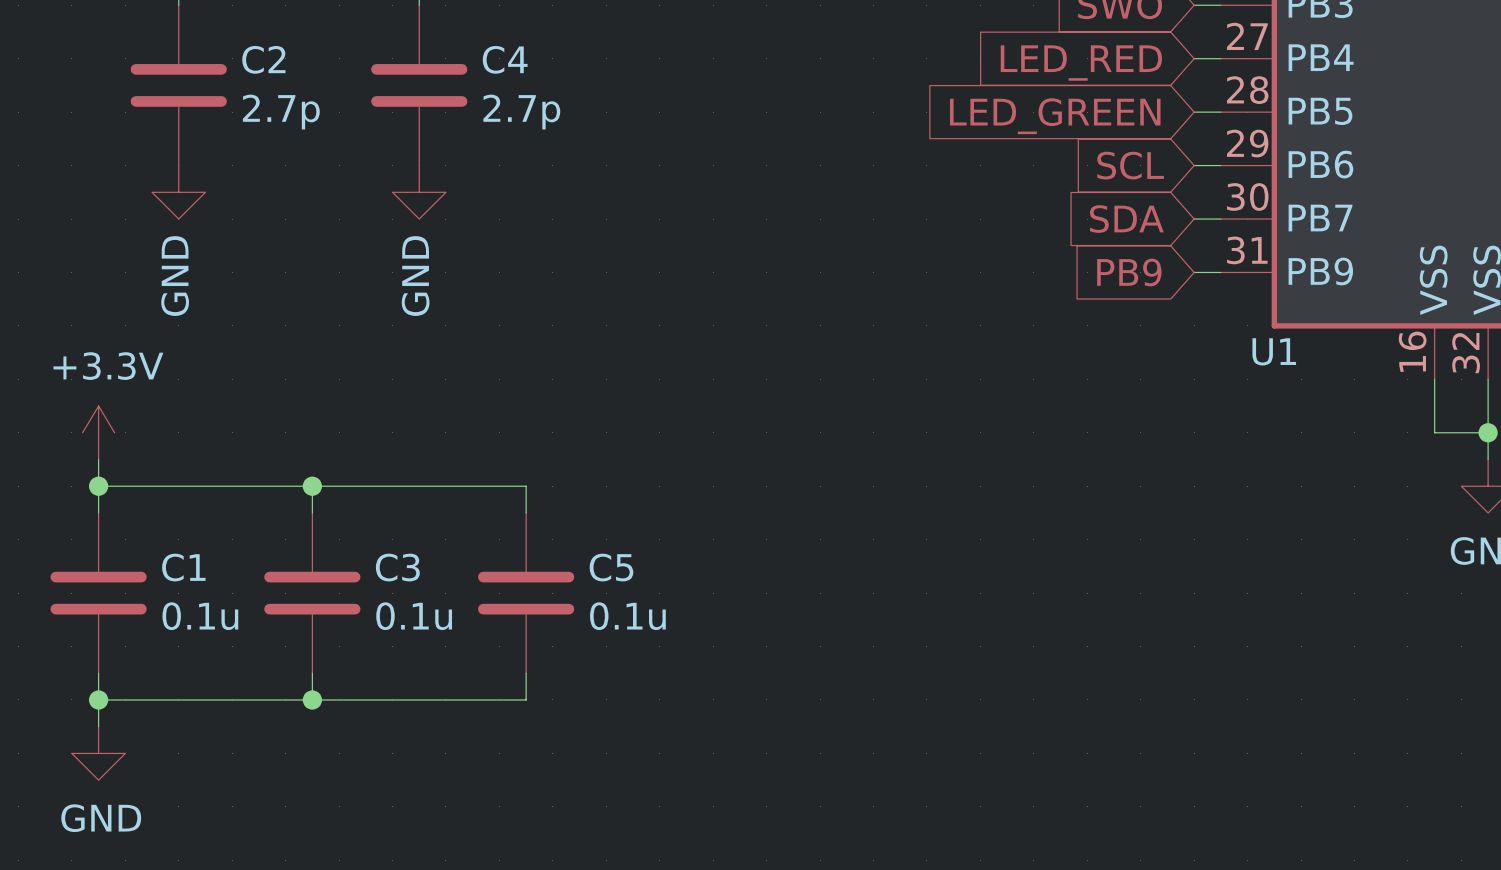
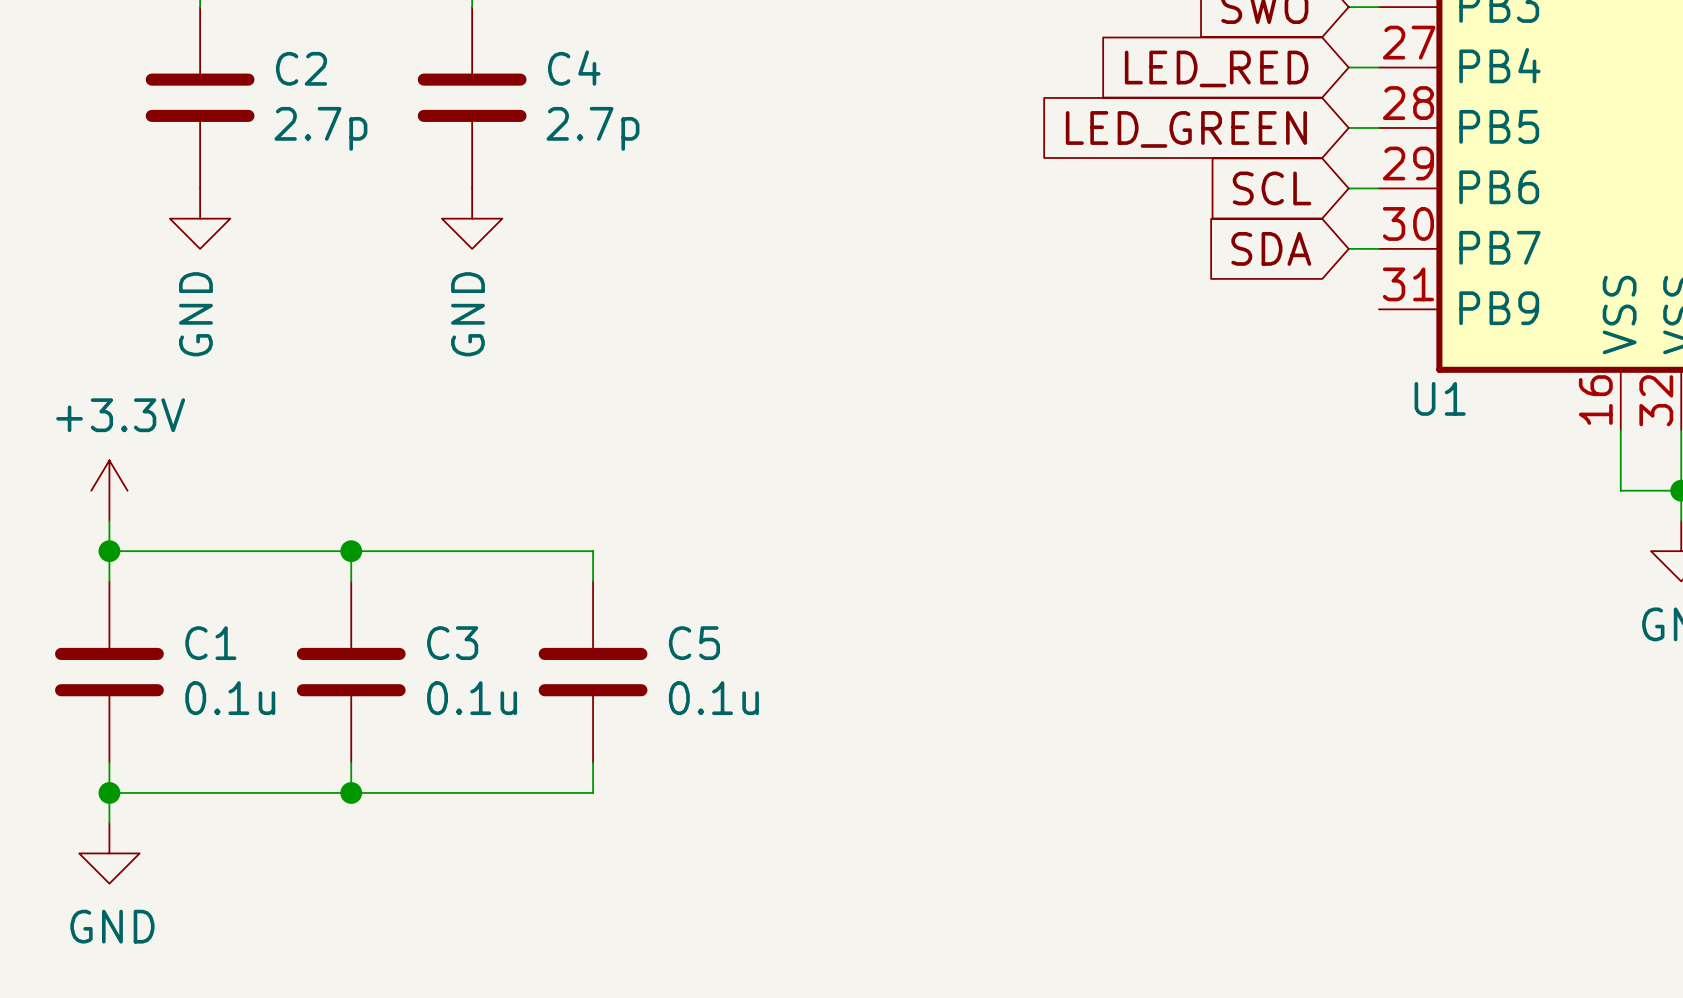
global label: PB9 (1129, 272) -> none
wire: (1194, 272) (1220, 272) -> none

